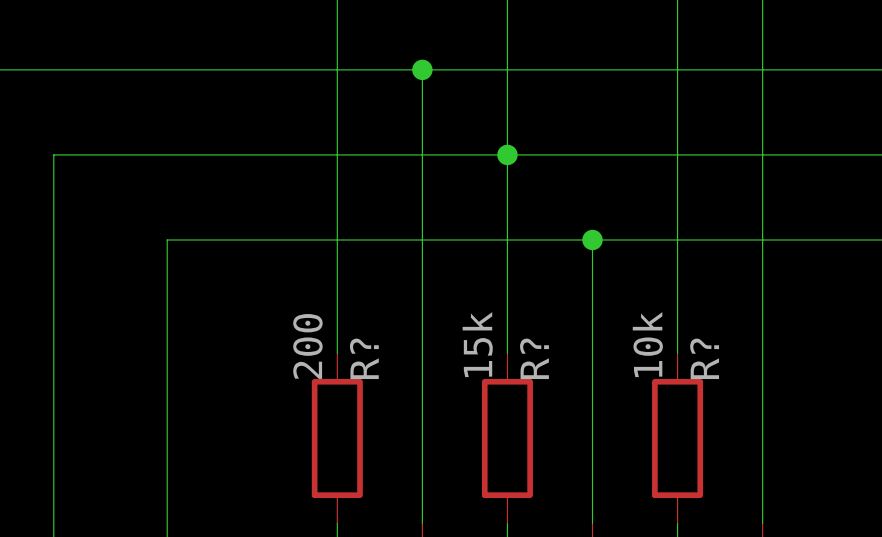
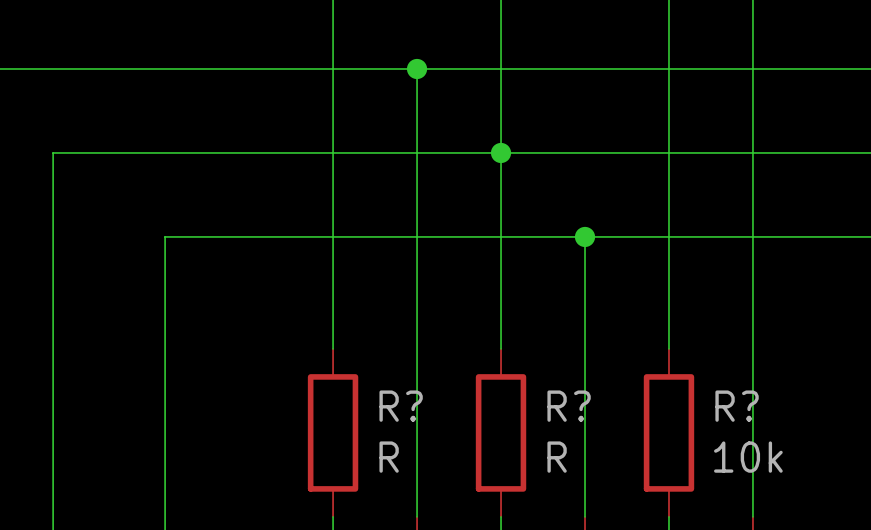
R? value: 15k (477, 344) -> R (557, 457)
R? value rotation: 0° (647, 344) -> 90° clockwise (748, 457)
R? value position: 10k (647, 344) -> 10k (748, 457)
R? value: 200 (307, 346) -> R (389, 457)
R? name rotation: 0° (364, 358) -> 90° clockwise (401, 406)
R? name position: R? (364, 358) -> R? (401, 406)
R? name rotation: 0° (534, 358) -> 90° clockwise (569, 406)
R? name position: R? (534, 358) -> R? (569, 406)
R? name rotation: 0° (704, 358) -> 90° clockwise (737, 406)
R? name position: R? (704, 358) -> R? (737, 406)

